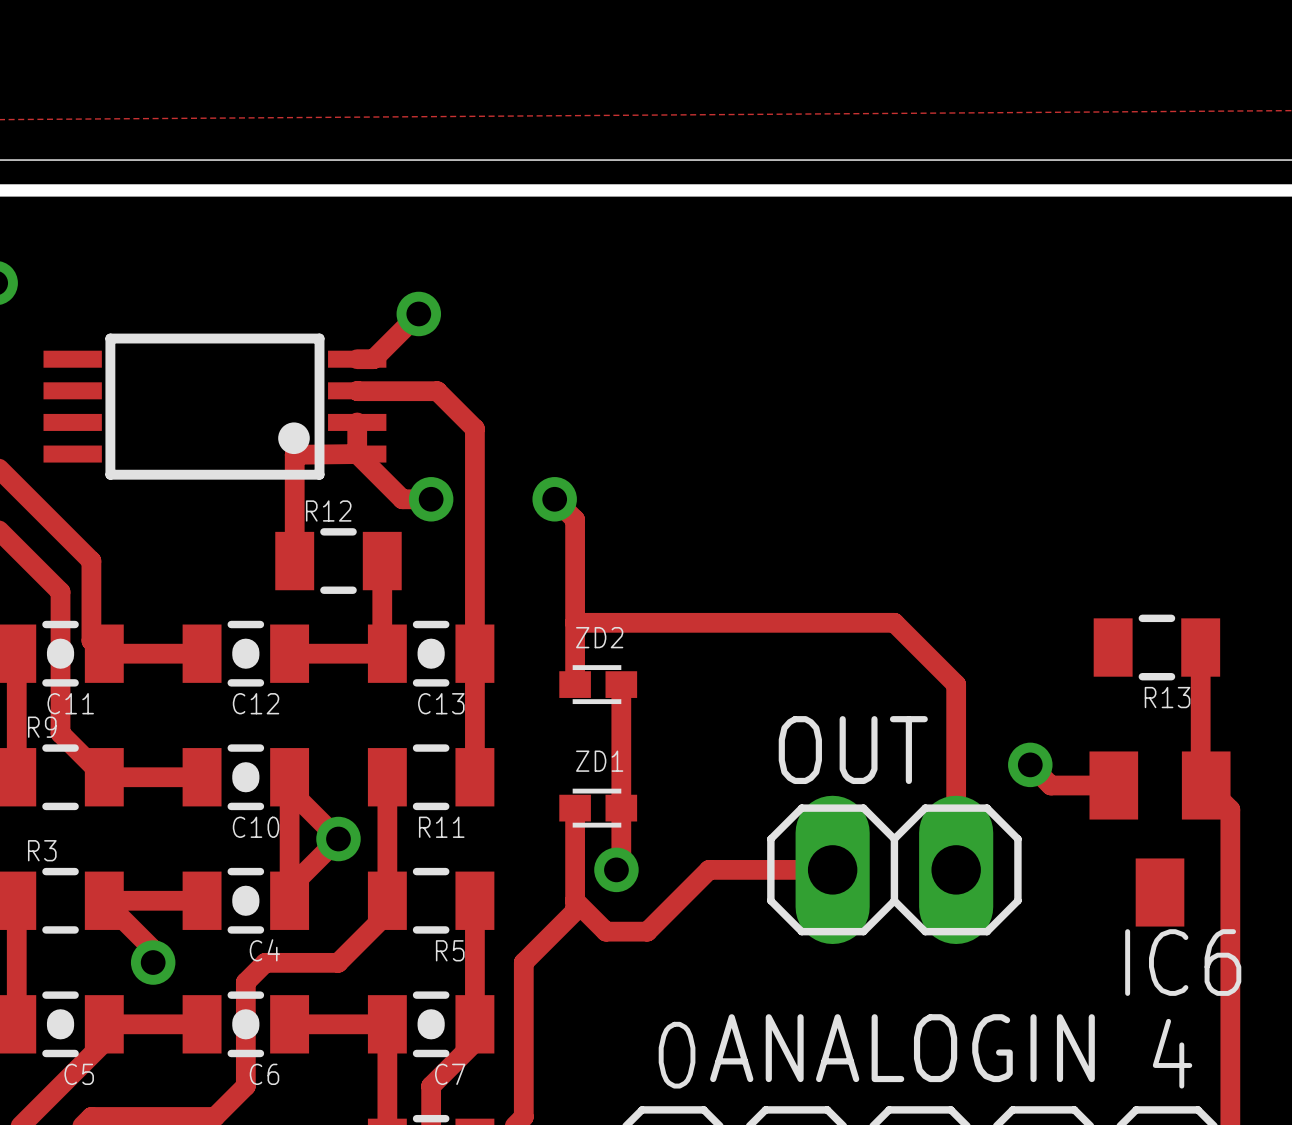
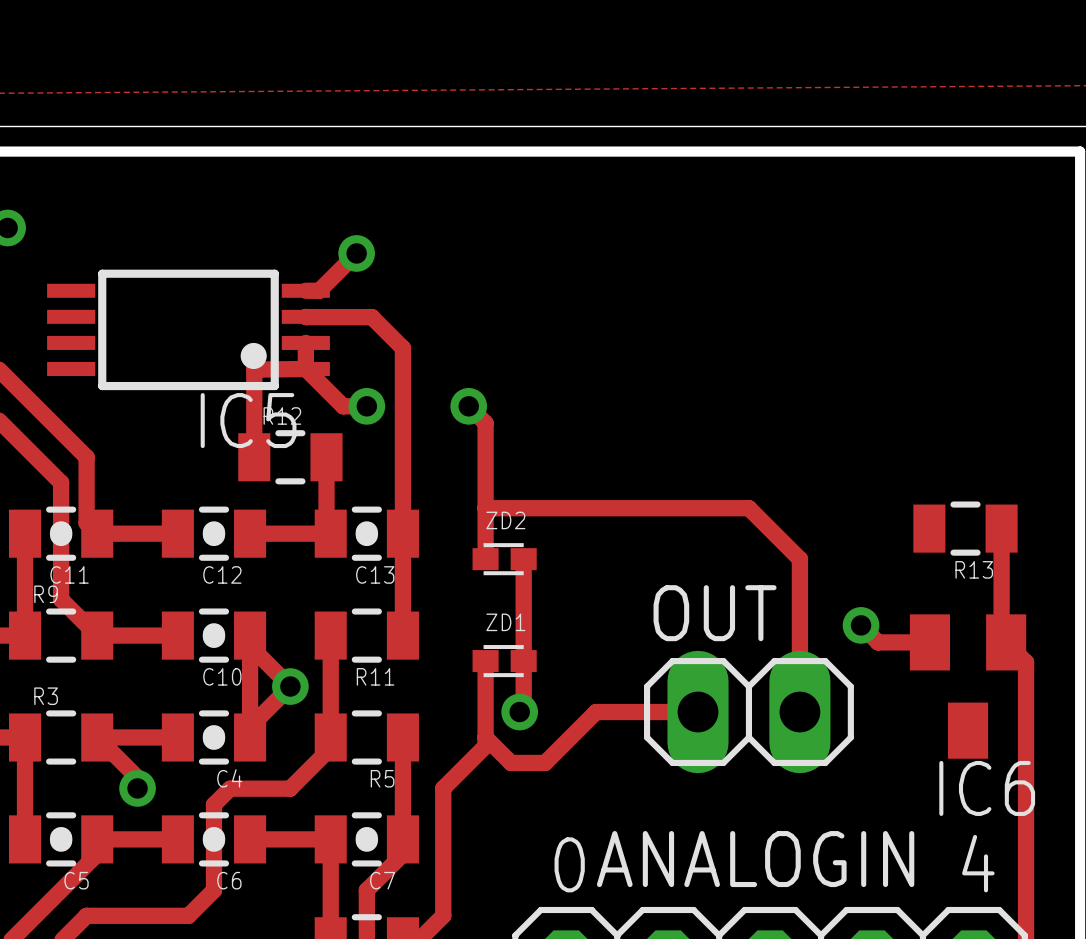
IC5 name: none -> IC5 (248, 420)

